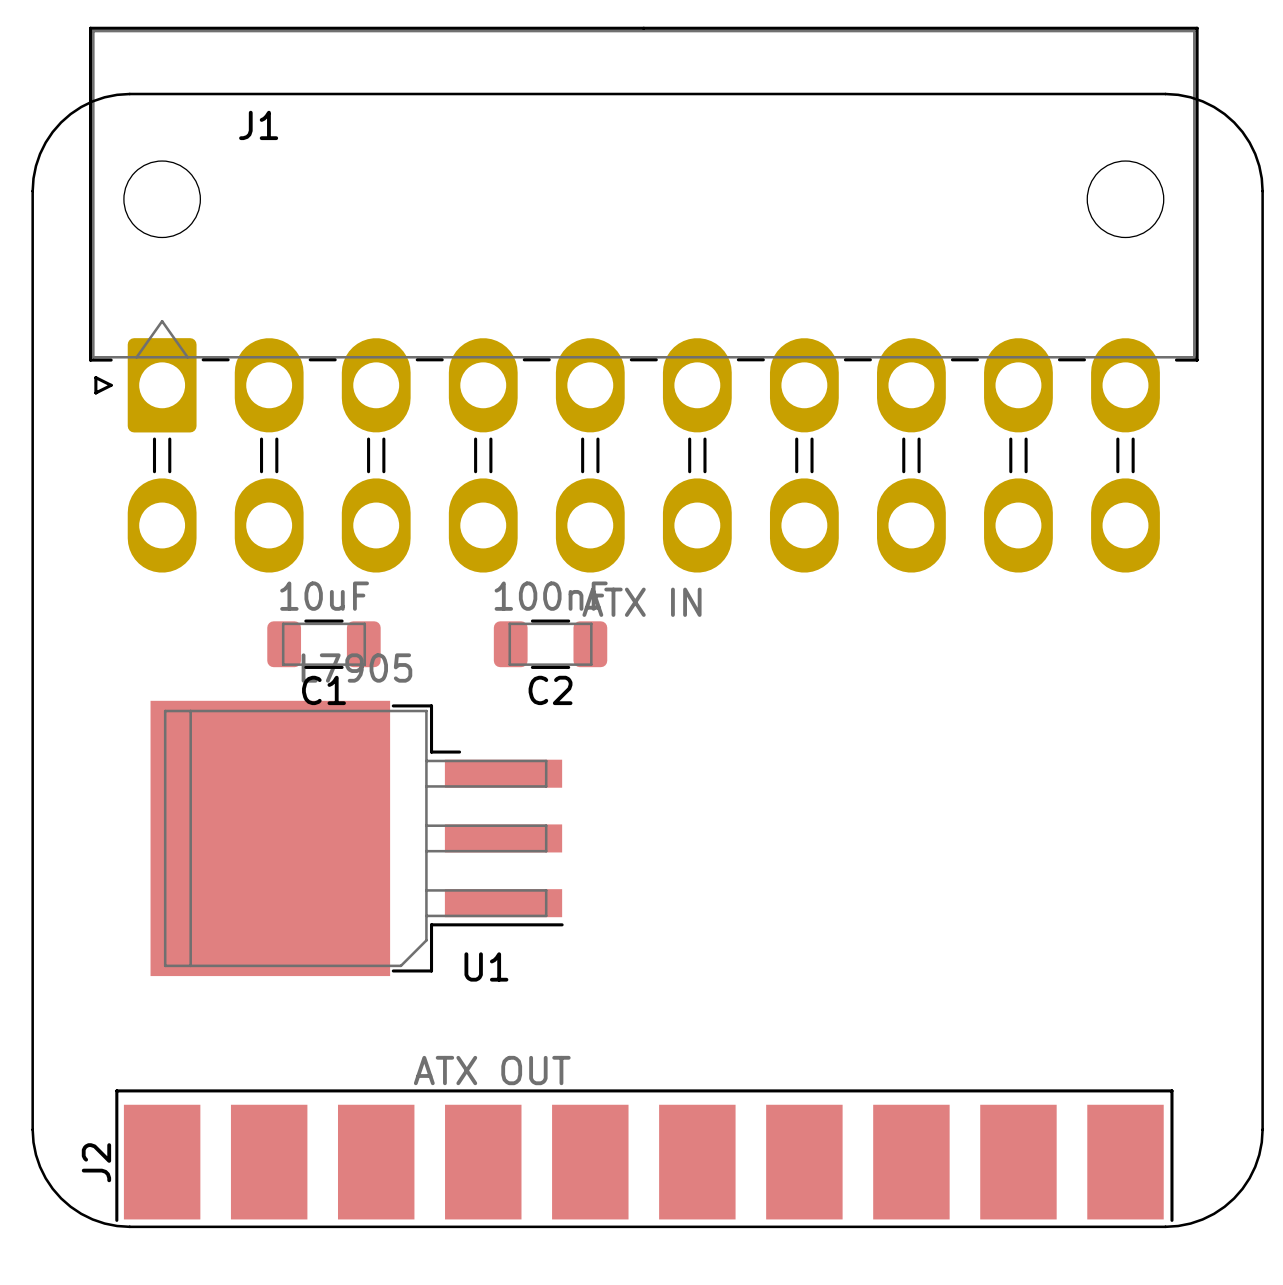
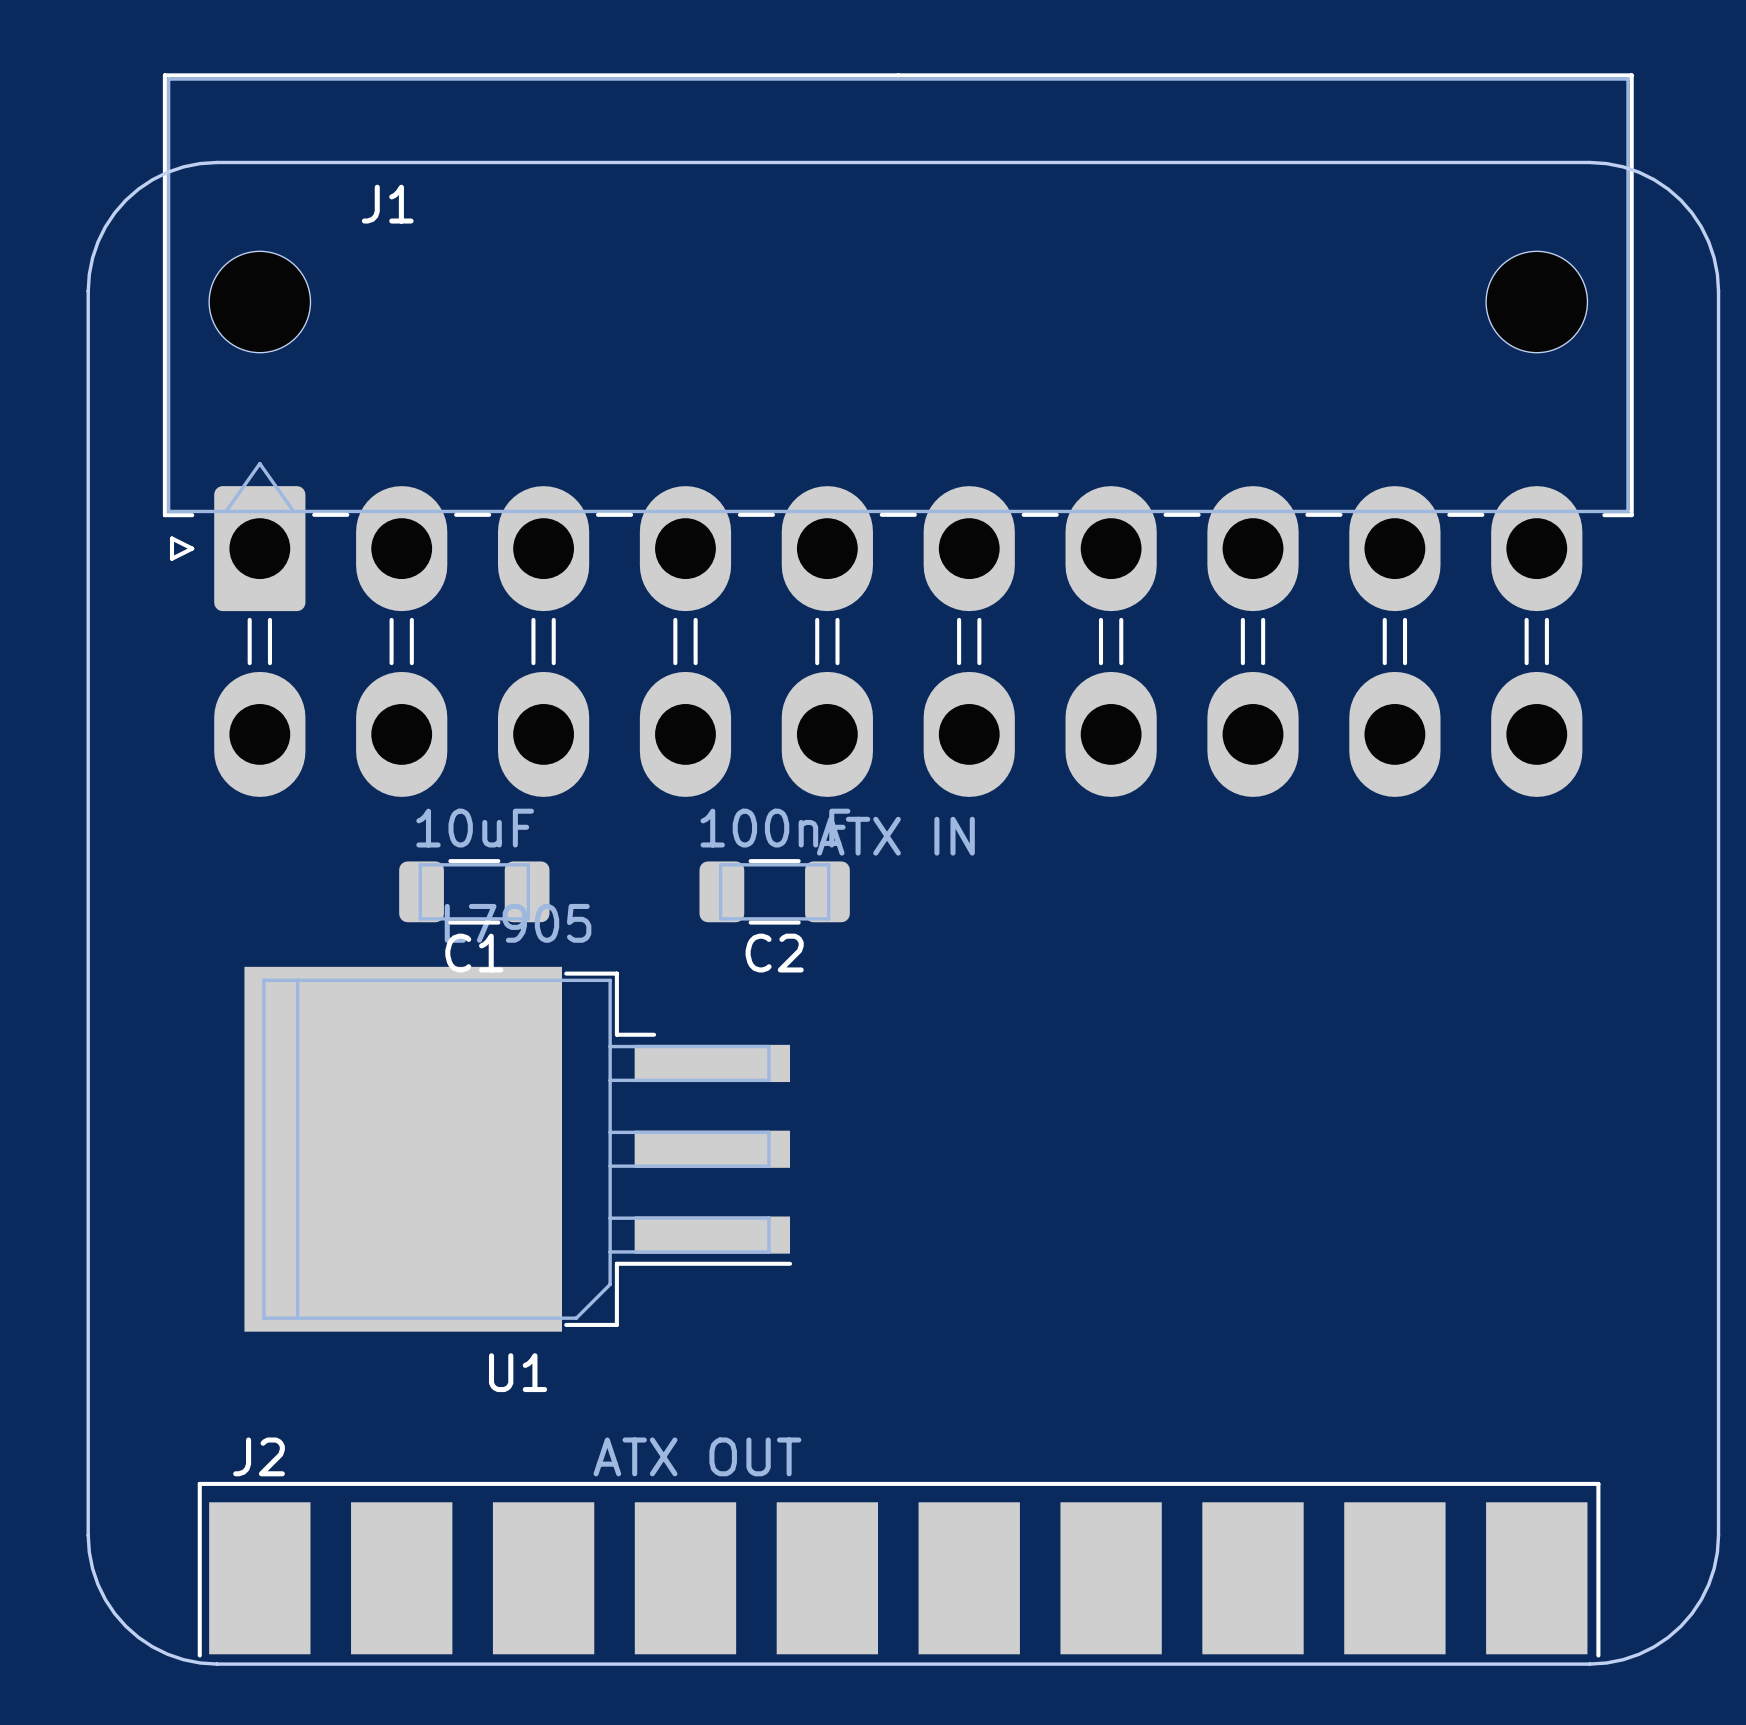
U1 name position: U1 (486, 966) -> U1 (518, 1372)
J2 name rotation: 0° (96, 1162) -> 90° clockwise (259, 1456)
J2 name position: J2 (96, 1162) -> J2 (259, 1456)

